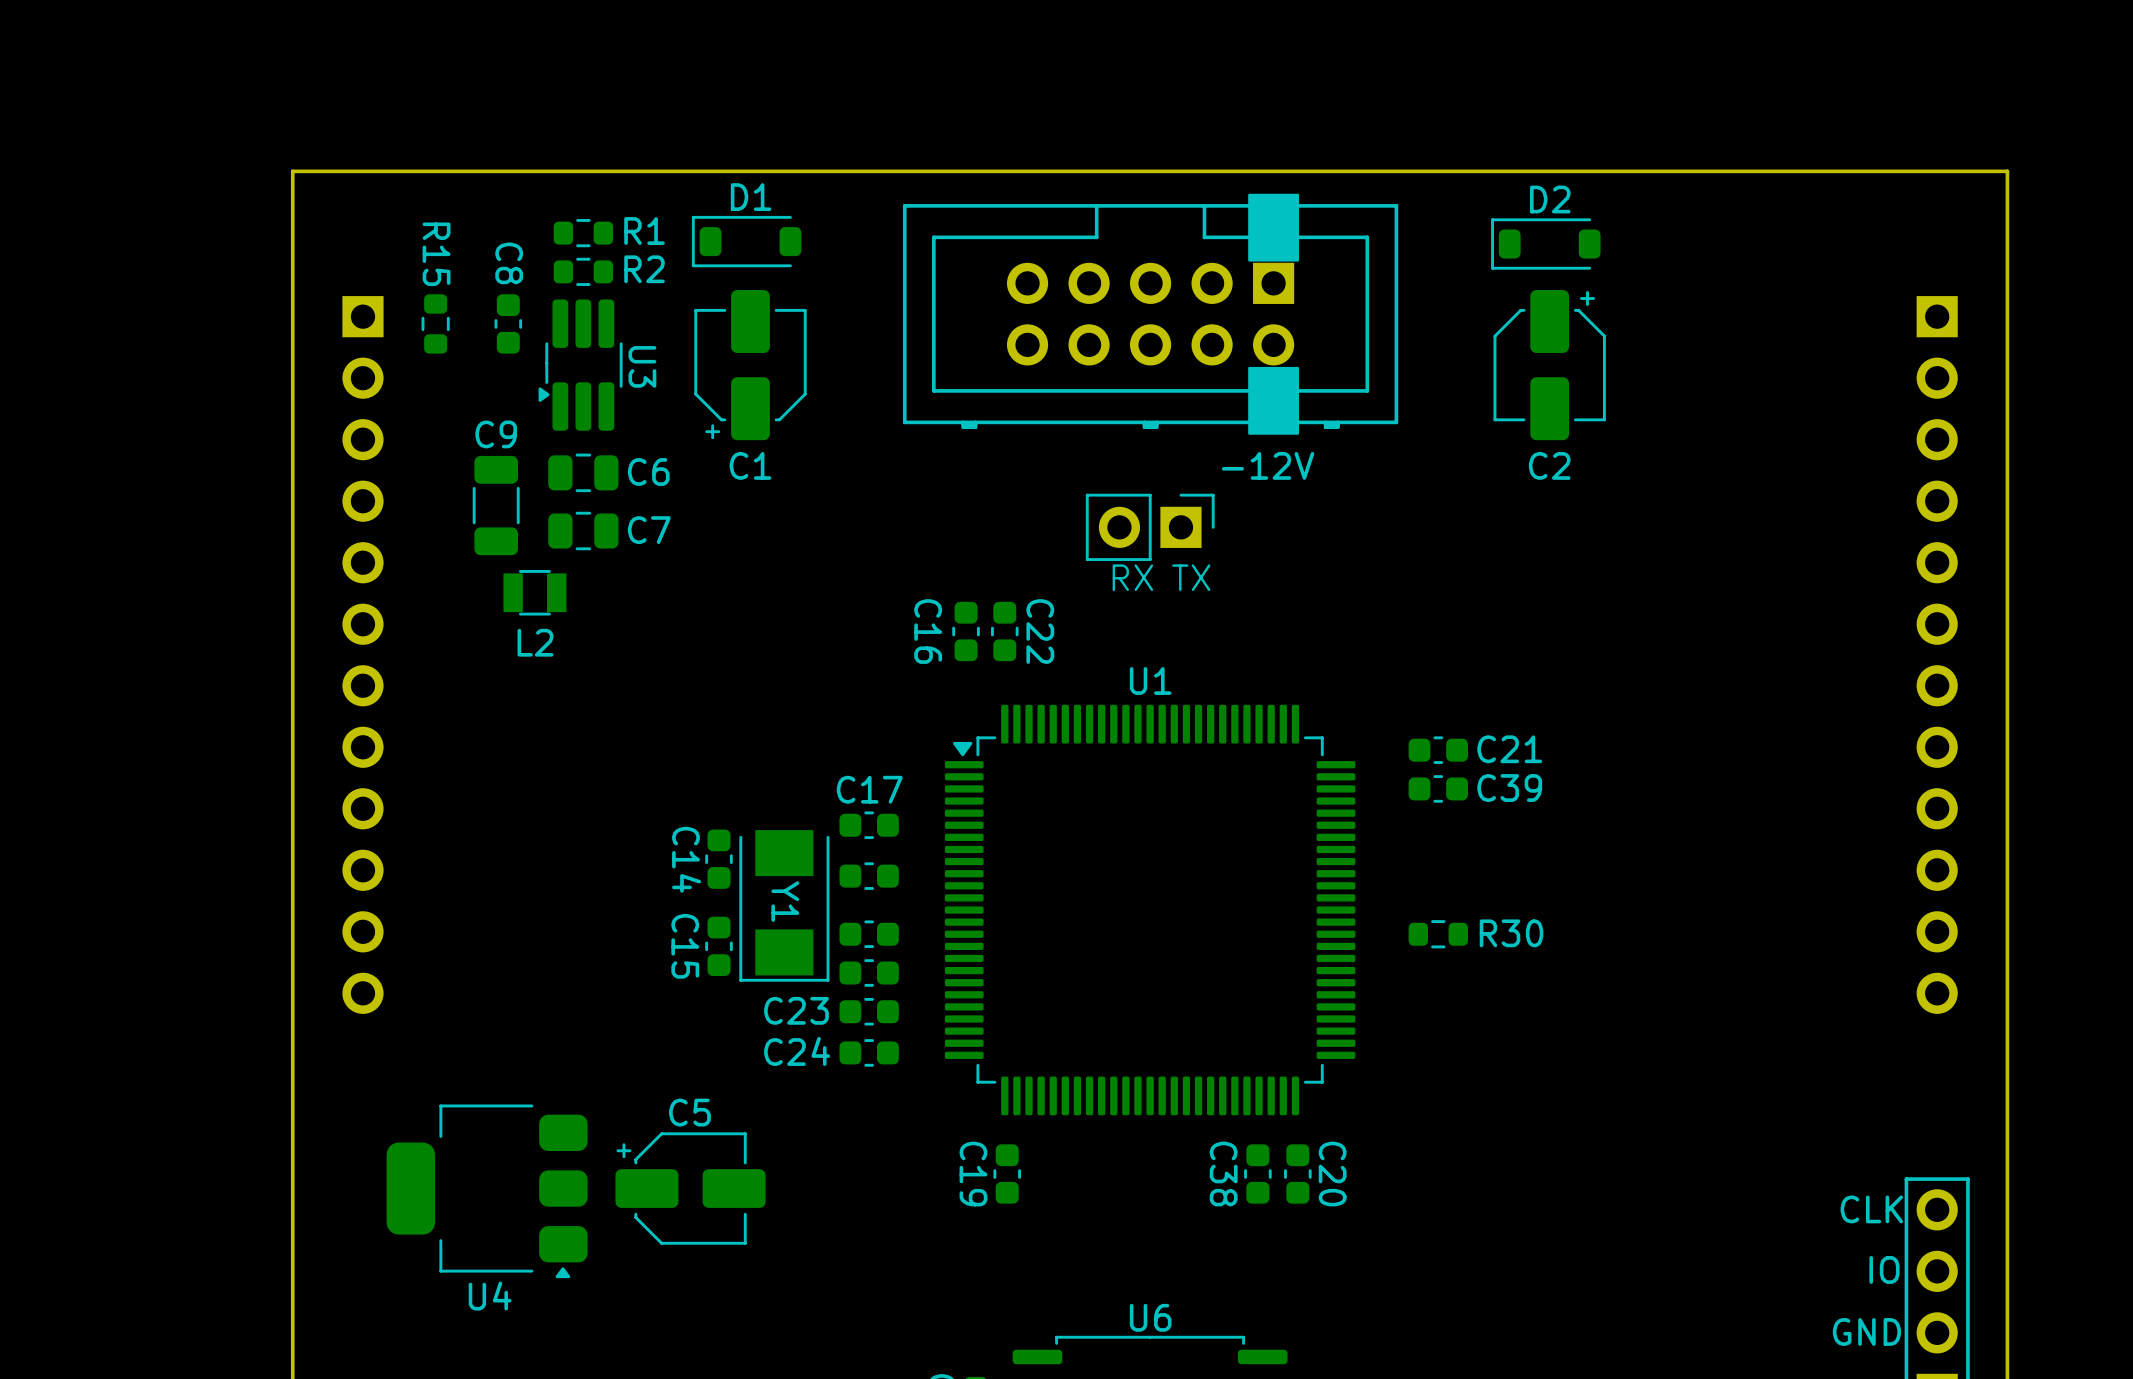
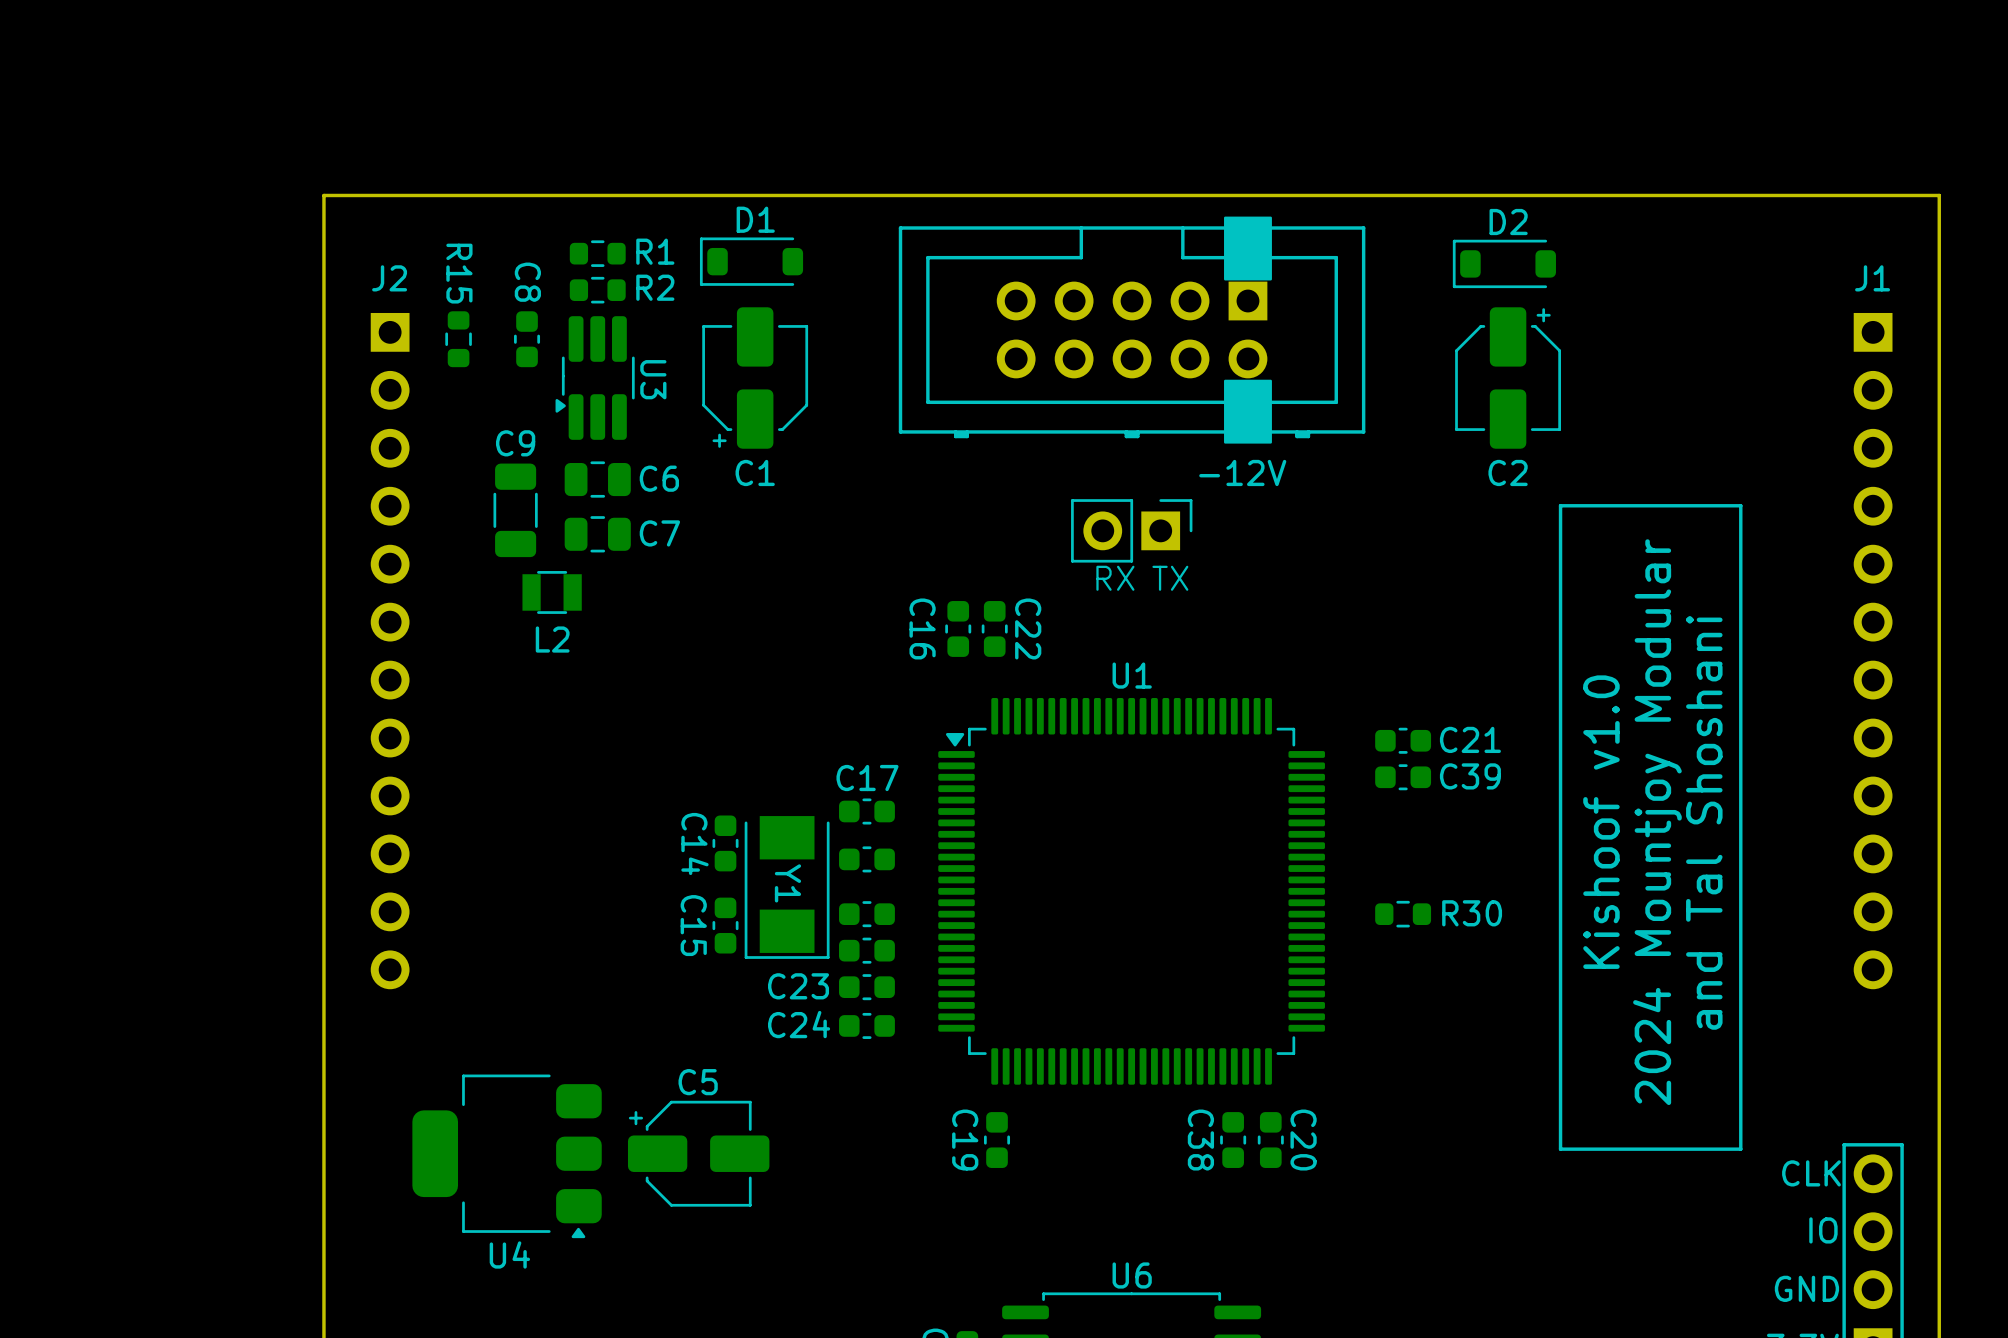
J2 name: none -> J2 (389, 278)
J1 name: none -> J1 (1872, 278)
line: none -> (1740, 505) (1560, 505) (1560, 1149) (1740, 1149) (1740, 505)
text: none -> Kishoof v1.0 (1601, 822)
text: none -> 2024 Mountjoy Modular (1657, 822)
text: none -> and Tal Shoshani (1704, 822)

